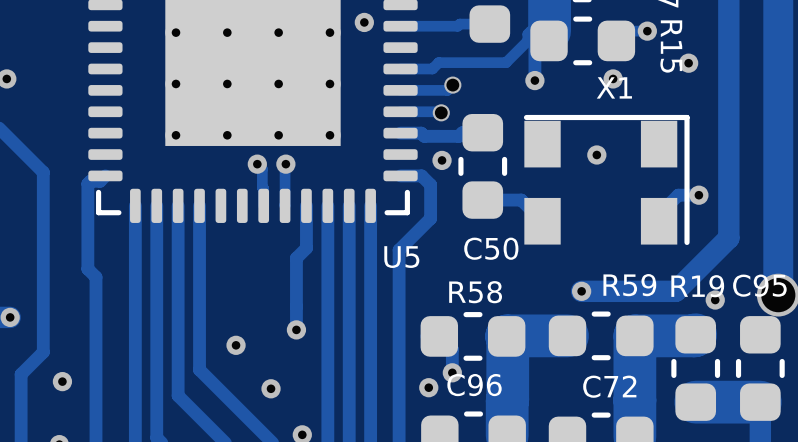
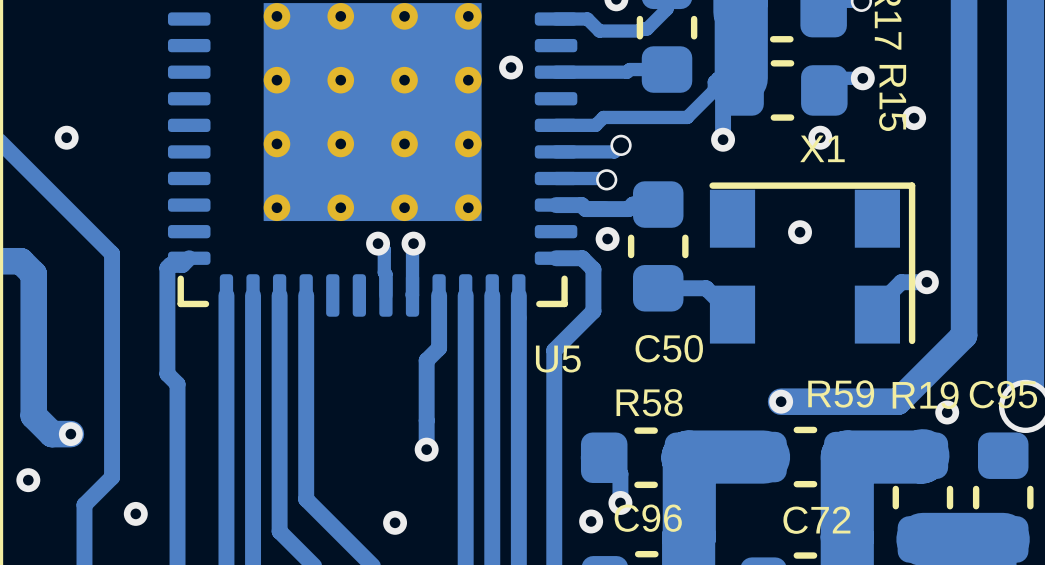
via: (236, 345) -> none

